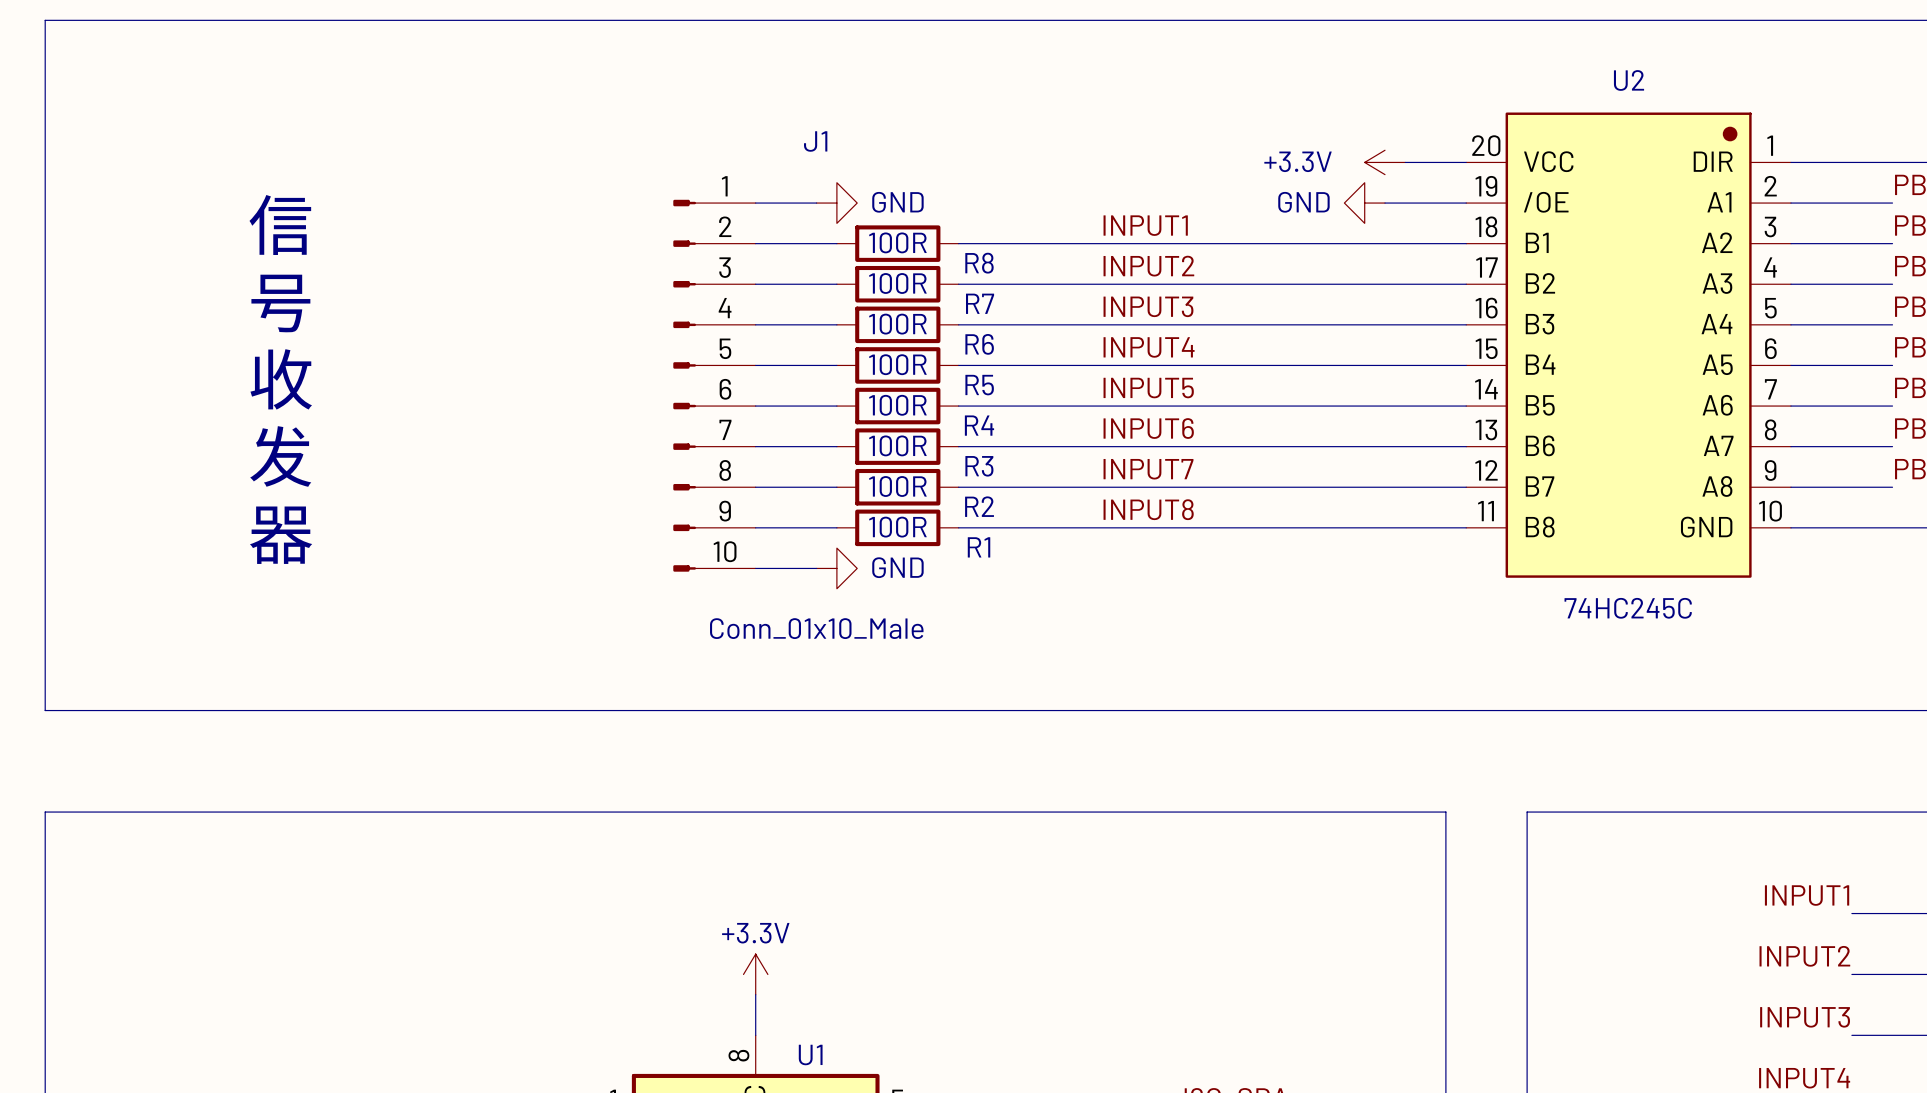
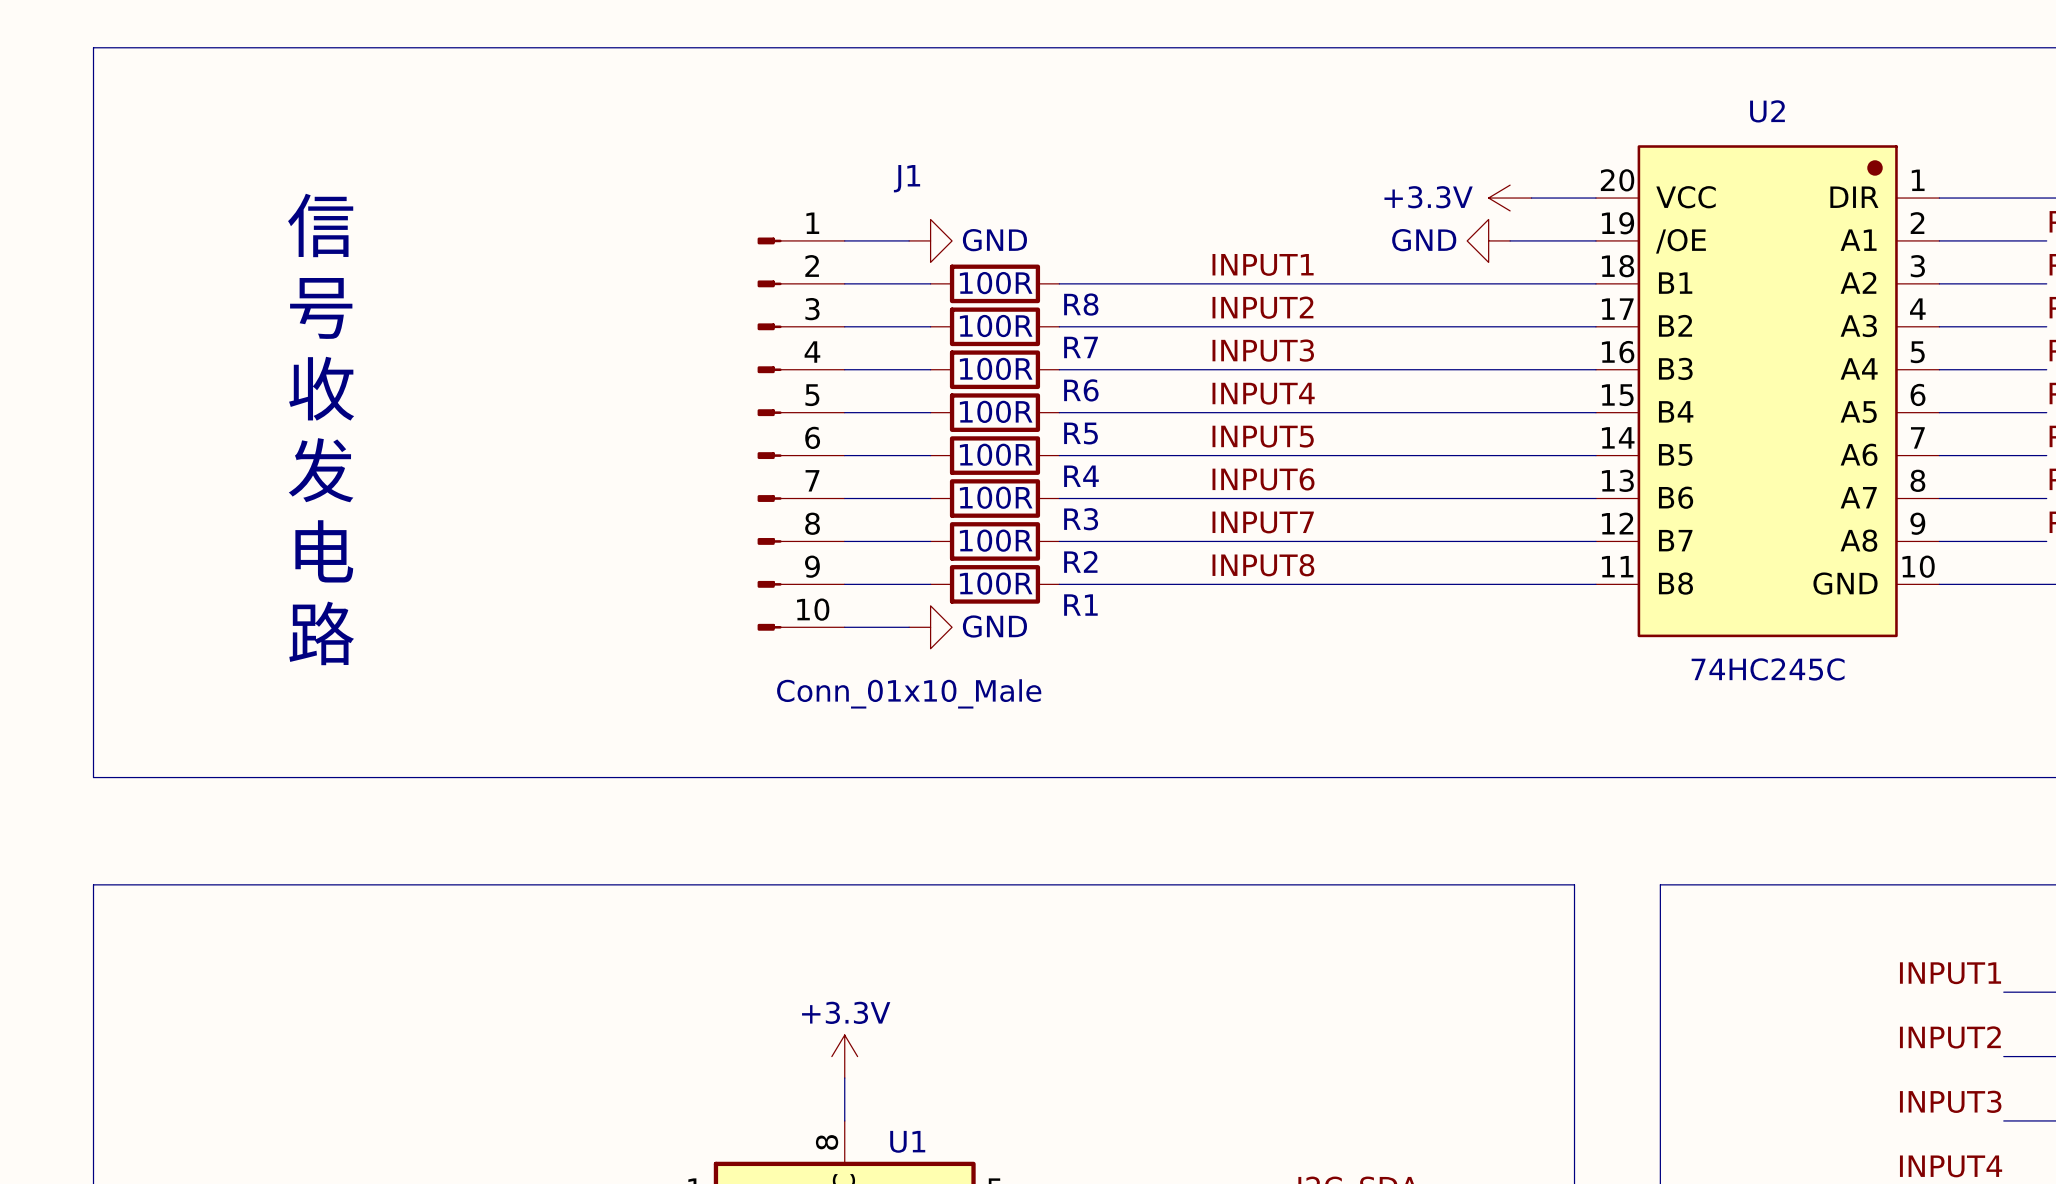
text position: 信 (280, 225) -> 信 (320, 225)
text position: 号 (280, 303) -> 号 (321, 308)
text position: 收 (281, 379) -> 收 (321, 388)
text position: 发 (280, 456) -> 发 (321, 470)
text: none -> 电 (324, 551)
text: 器 (281, 535) -> none
text: none -> 路 (321, 633)

